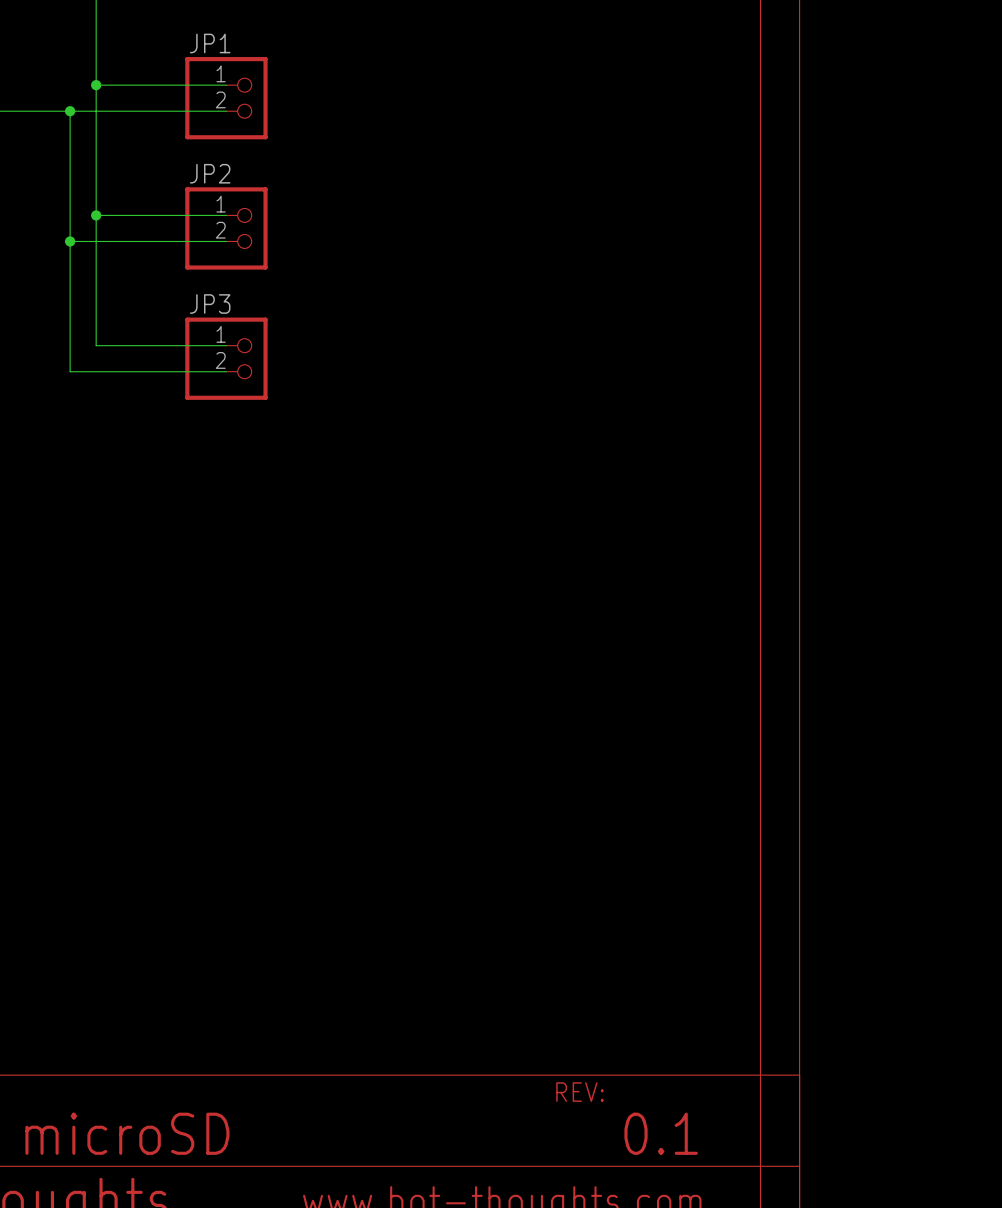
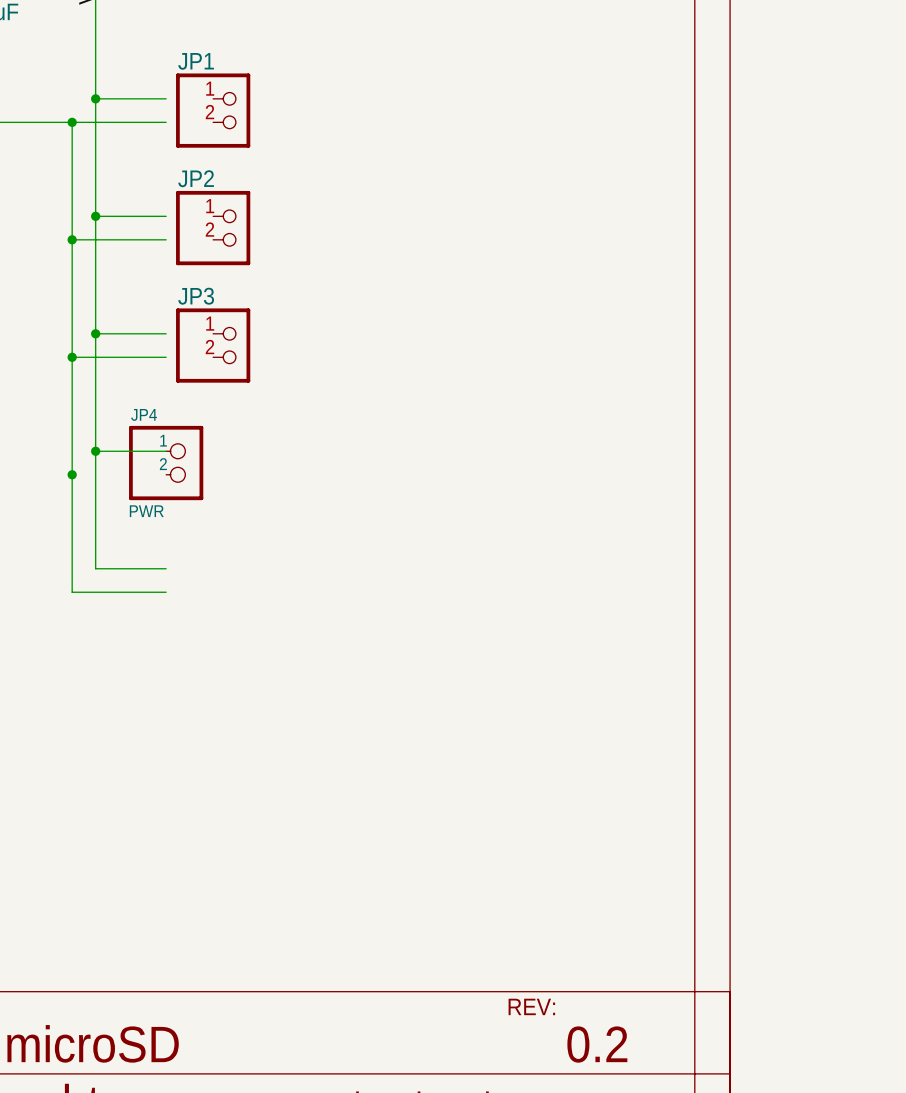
wire: (174, 85) (226, 85) -> none
wire: (174, 111) (226, 111) -> none
wire: (174, 215) (226, 215) -> none
wire: (174, 241) (226, 241) -> none
wire: none -> (95, 333) (95, 568) (166, 568)
junction: none -> (95, 333)
wire: (174, 345) (226, 345) -> none
wire: none -> (72, 357) (72, 592) (166, 592)
junction: none -> (72, 357)
wire: (174, 371) (226, 371) -> none
wire: none -> (95, 451) (166, 451)
junction: none -> (95, 451)
JP4: none -> PWR (166, 463)
junction: none -> (72, 474)
text: 0.1 (661, 1133) -> 0.2 (597, 1044)

